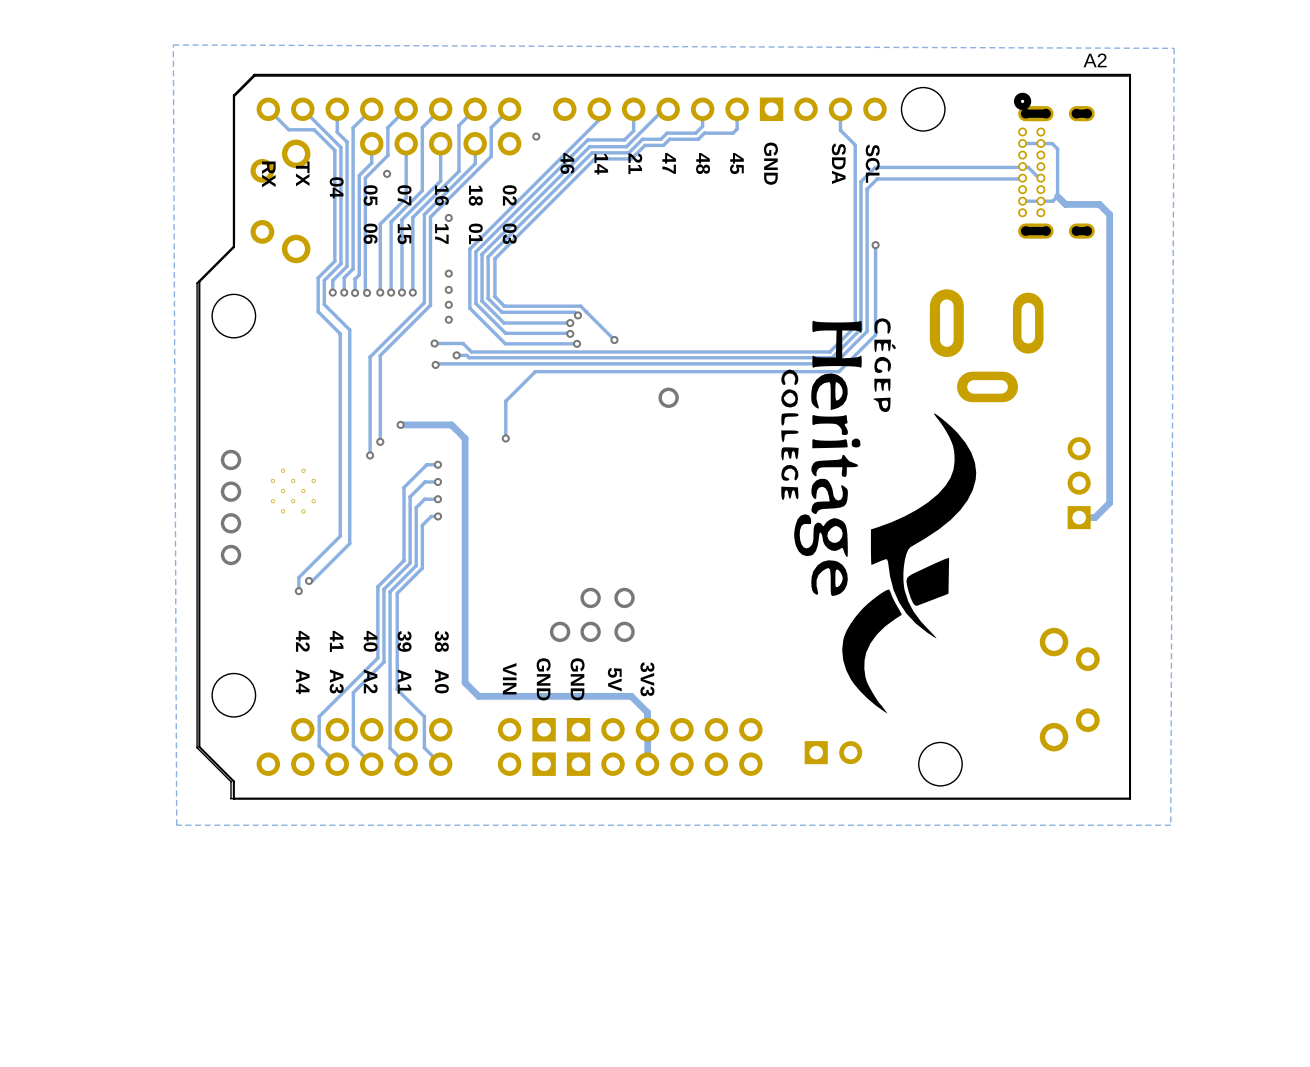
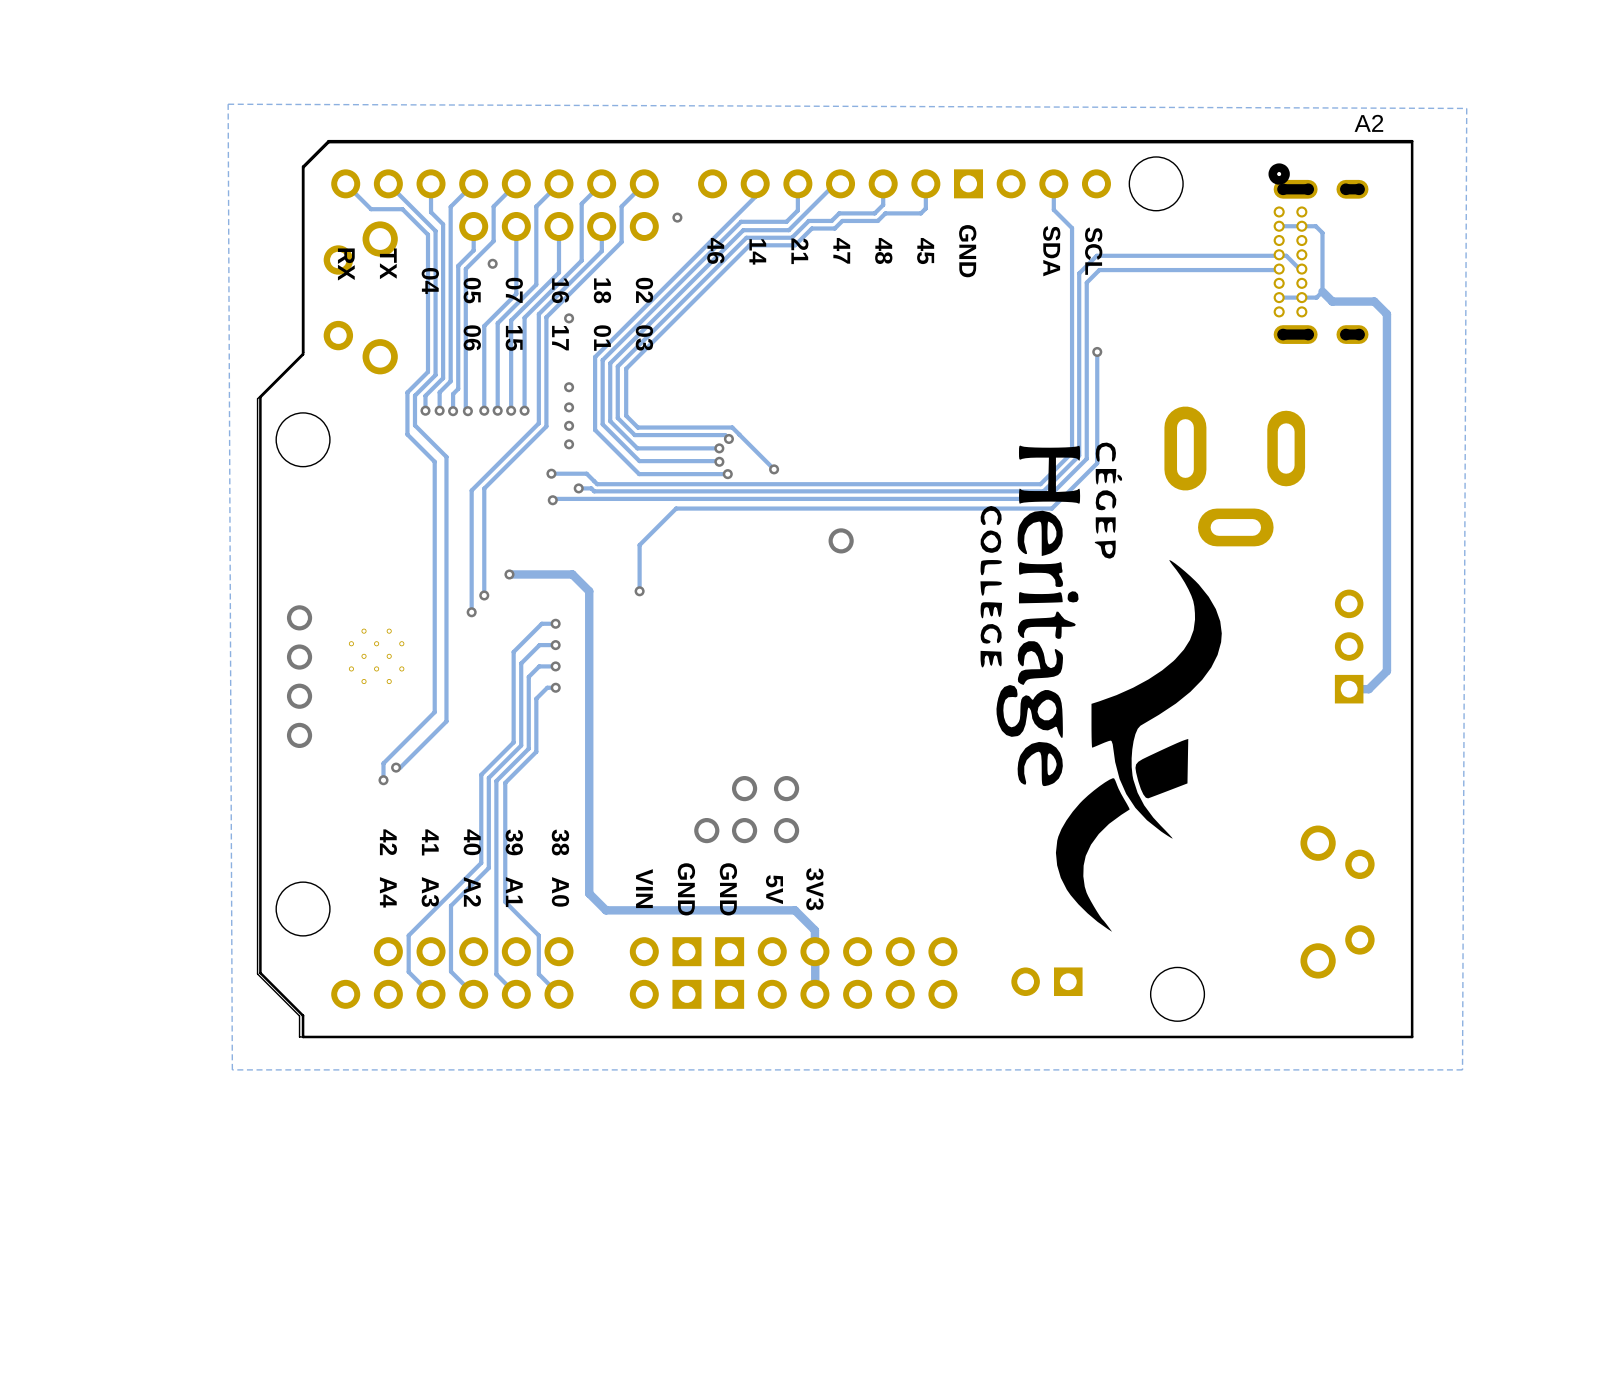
part rotation: 0° (833, 752) -> 180° (1046, 981)

